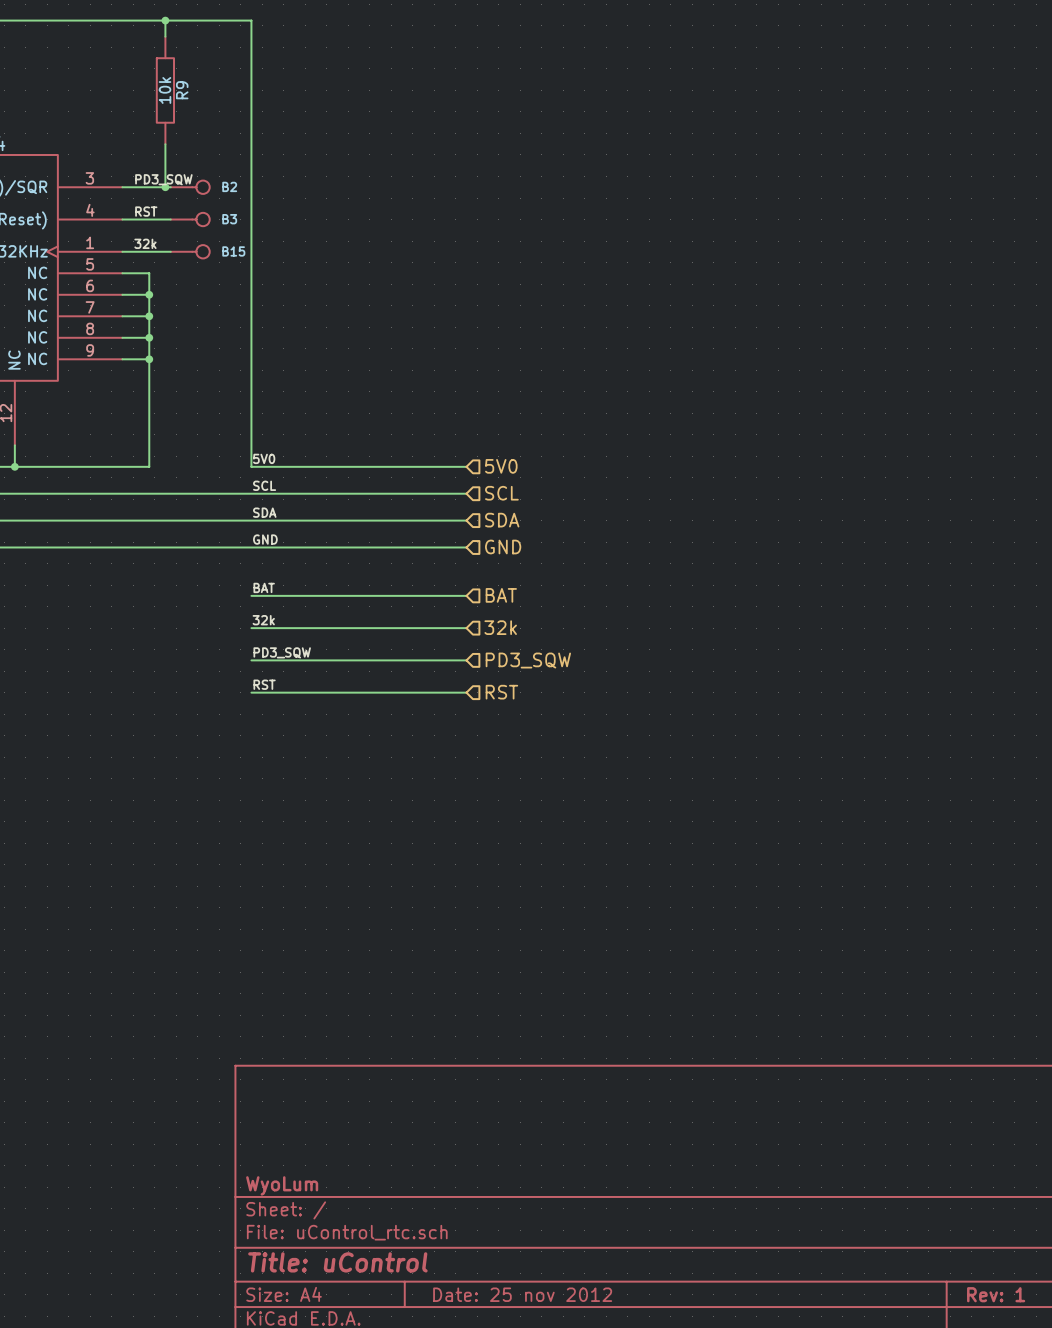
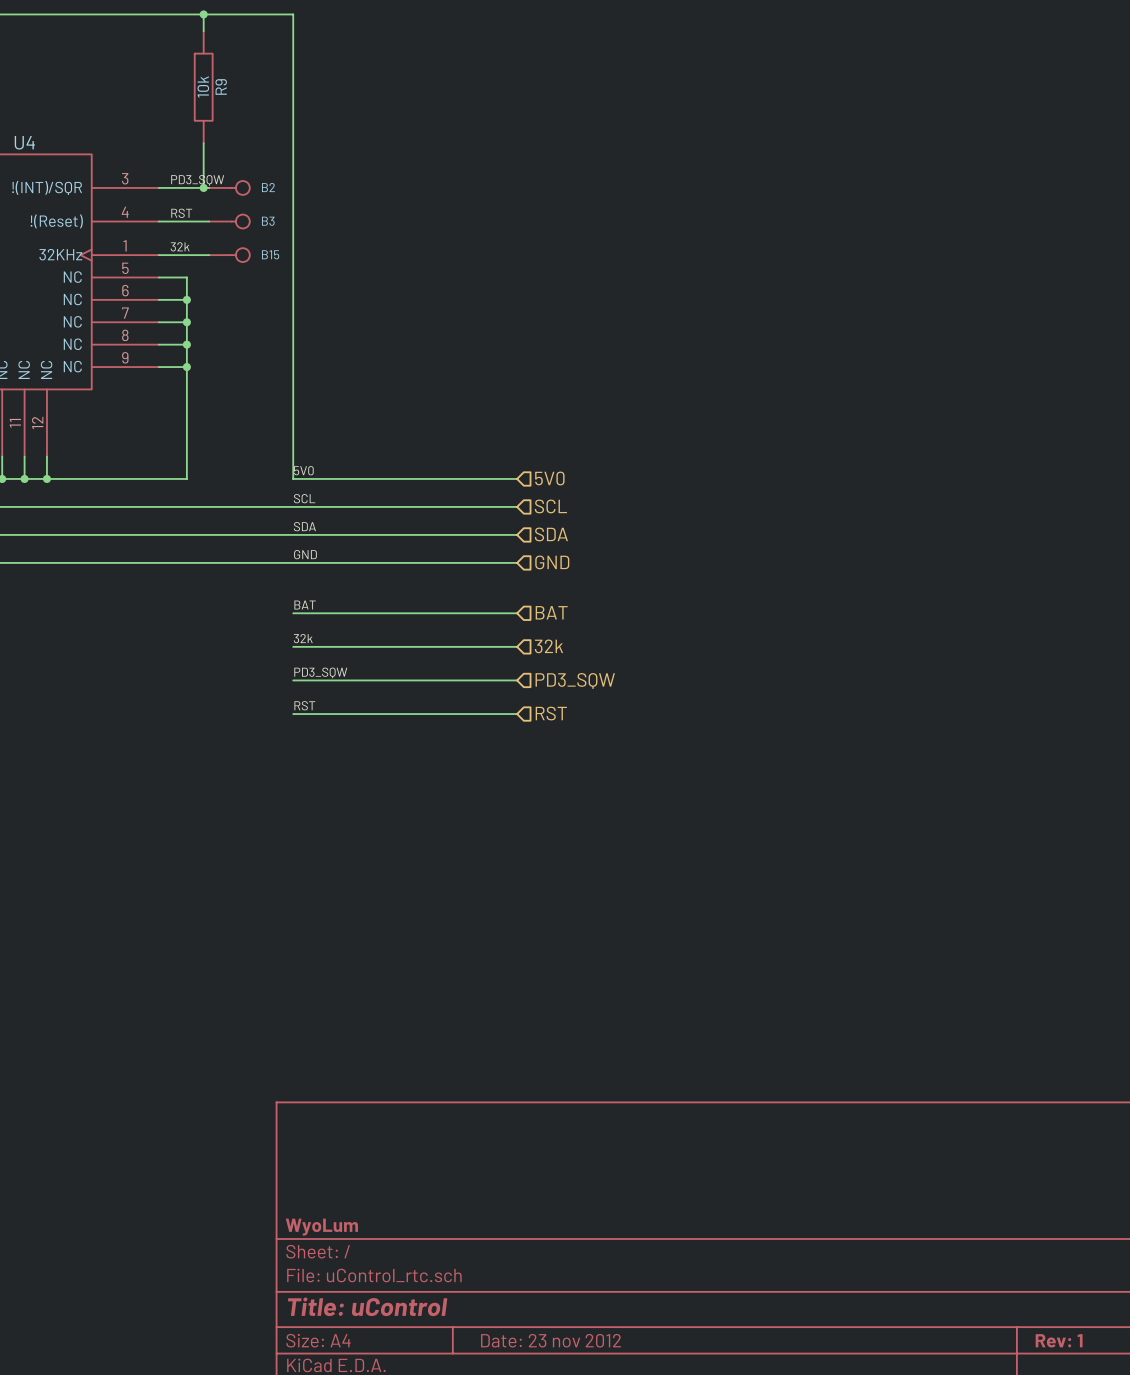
title block: Date: 25 nov 2012 (522, 1294) -> Date: 23 nov 2012 (551, 1340)

